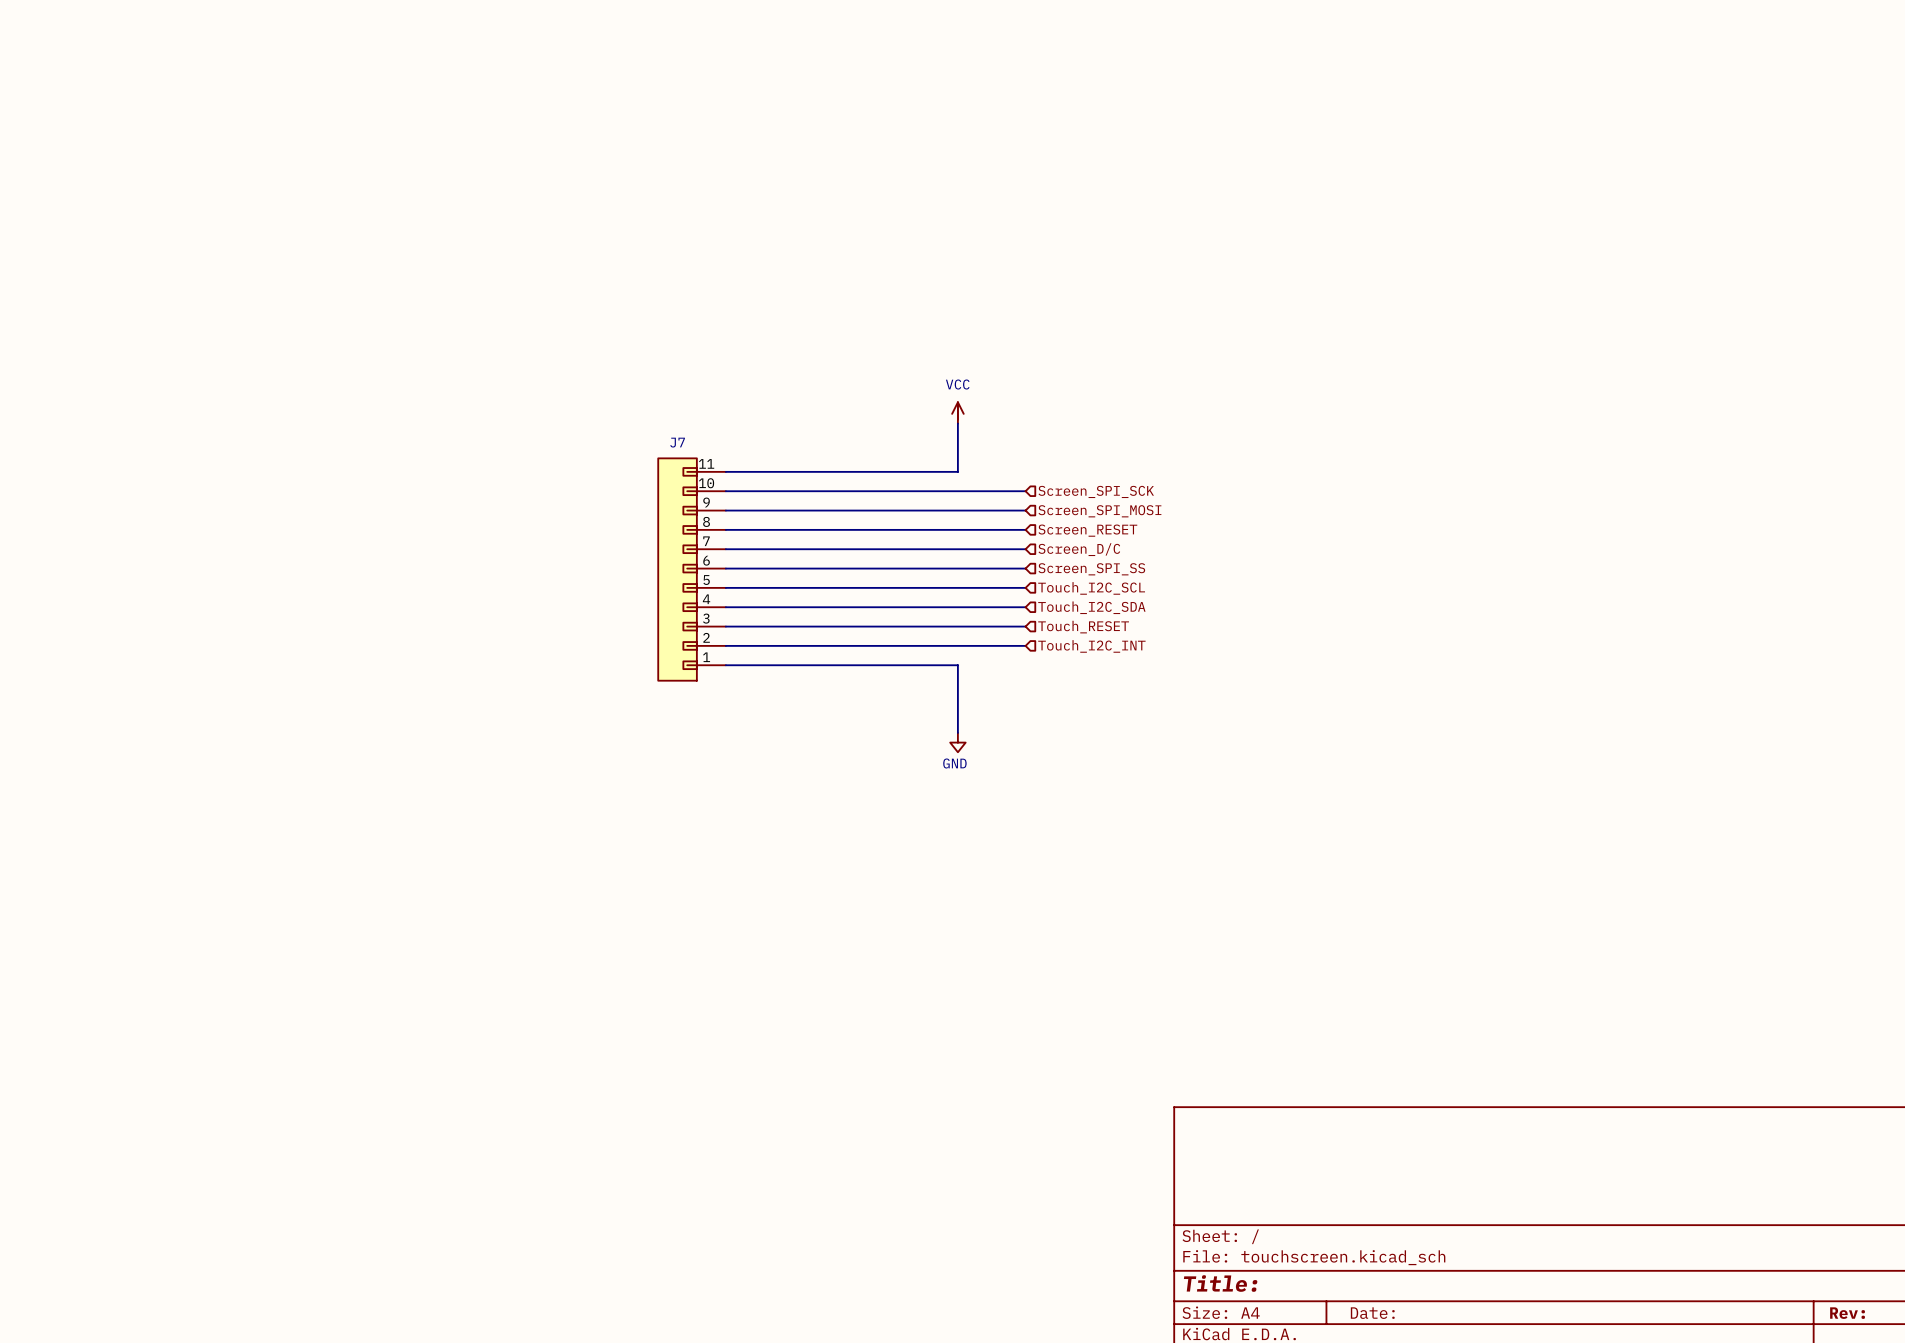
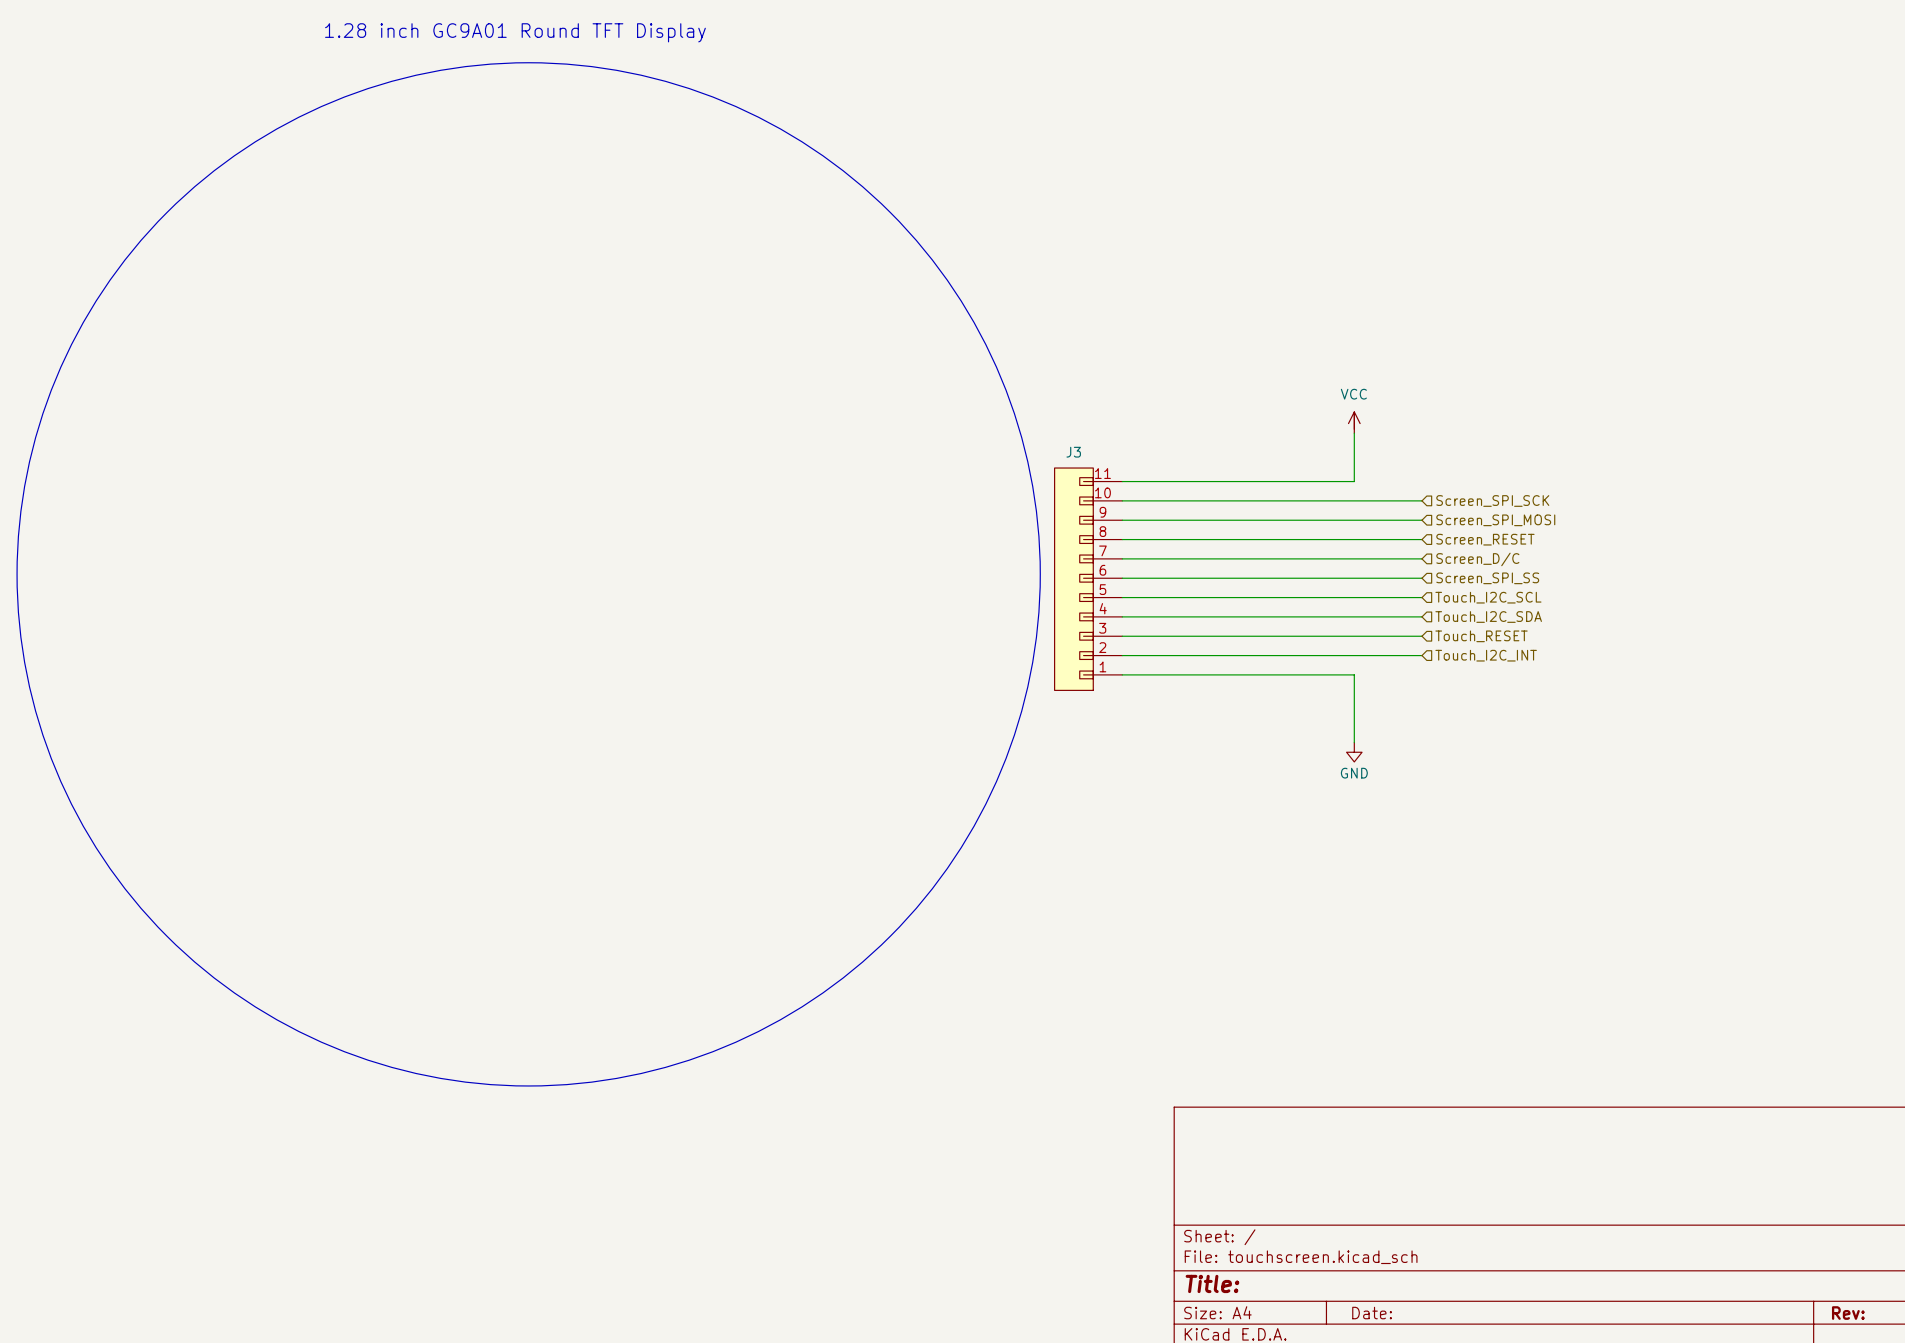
text: none -> 1.28 inch GC9A01 Round TFT Display (515, 32)
drawing: none -> [17, 62, 1041, 1086]
power symbol: VCC (957, 412) -> none
power symbol: none -> VCC (1354, 422)
wire: (957, 423) (957, 471) (725, 471) -> none
wire: none -> (1354, 433) (1354, 481) (1122, 481)
wire: (725, 491) (1025, 491) -> none
hierarchical label: Screen_SPI_SCK (1096, 491) -> none
wire: none -> (1122, 500) (1421, 500)
hierarchical label: none -> Screen_SPI_SCK (1492, 500)
wire: (725, 510) (1025, 510) -> none
hierarchical label: Screen_SPI_MOSI (1099, 511) -> none
wire: none -> (1122, 520) (1421, 520)
hierarchical label: none -> Screen_SPI_MOSI (1495, 520)
wire: (725, 529) (1025, 529) -> none
hierarchical label: Screen_RESET (1087, 530) -> none
wire: none -> (1122, 539) (1421, 539)
hierarchical label: none -> Screen_RESET (1485, 539)
wire: (725, 549) (1025, 549) -> none
hierarchical label: Screen_D/C (1079, 549) -> none
wire: none -> (1122, 558) (1421, 558)
hierarchical label: none -> Screen_D/C (1477, 559)
wire: (725, 568) (1025, 568) -> none
J7: (692, 569) -> none
hierarchical label: Screen_SPI_SS (1091, 569) -> none
wire: none -> (1122, 578) (1421, 578)
hierarchical label: none -> Screen_SPI_SS (1487, 578)
J3: none -> (1088, 579)
wire: (725, 587) (1025, 587) -> none
hierarchical label: Touch_I2C_SCL (1091, 588) -> none
wire: none -> (1122, 597) (1421, 597)
hierarchical label: none -> Touch_I2C_SCL (1488, 597)
wire: (725, 607) (1025, 607) -> none
hierarchical label: Touch_I2C_SDA (1091, 607) -> none
wire: none -> (1122, 616) (1421, 616)
hierarchical label: none -> Touch_I2C_SDA (1488, 617)
wire: (725, 626) (1025, 626) -> none
hierarchical label: Touch_RESET (1083, 627) -> none
wire: none -> (1122, 636) (1421, 636)
hierarchical label: none -> Touch_RESET (1481, 636)
wire: (725, 645) (1025, 645) -> none
hierarchical label: Touch_I2C_INT (1091, 646) -> none
wire: none -> (1122, 655) (1421, 655)
hierarchical label: none -> Touch_I2C_INT (1486, 655)
wire: (725, 665) (957, 665) (957, 732) -> none
wire: none -> (1122, 674) (1354, 674) (1354, 742)
power symbol: GND (957, 742) -> none
power symbol: none -> GND (1354, 752)

